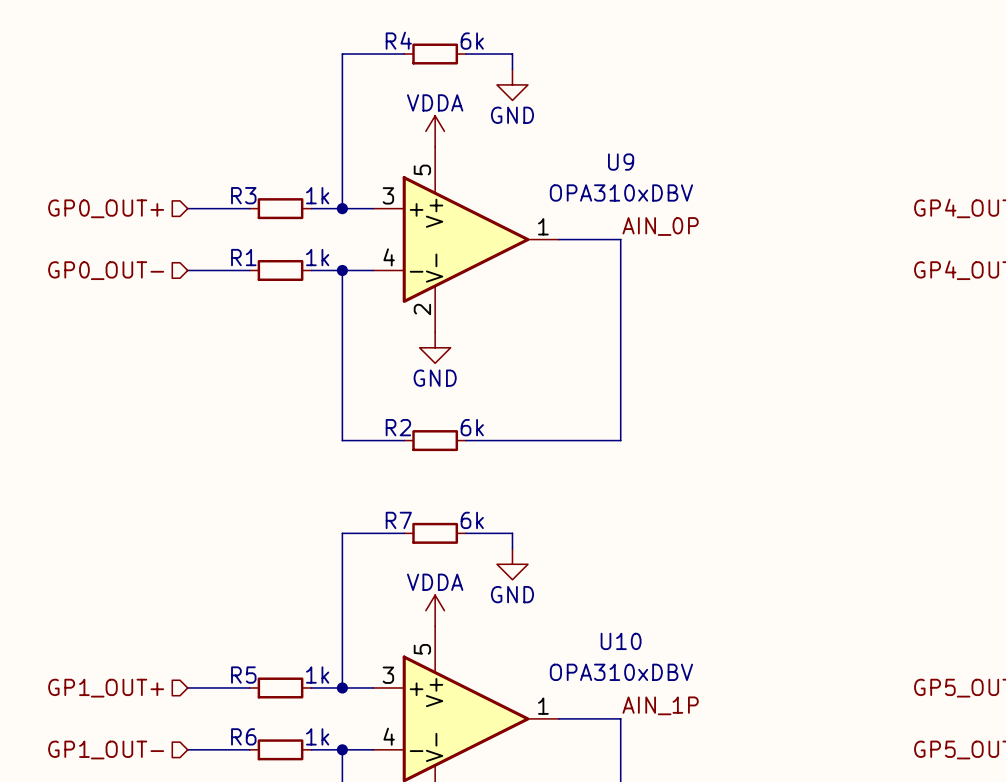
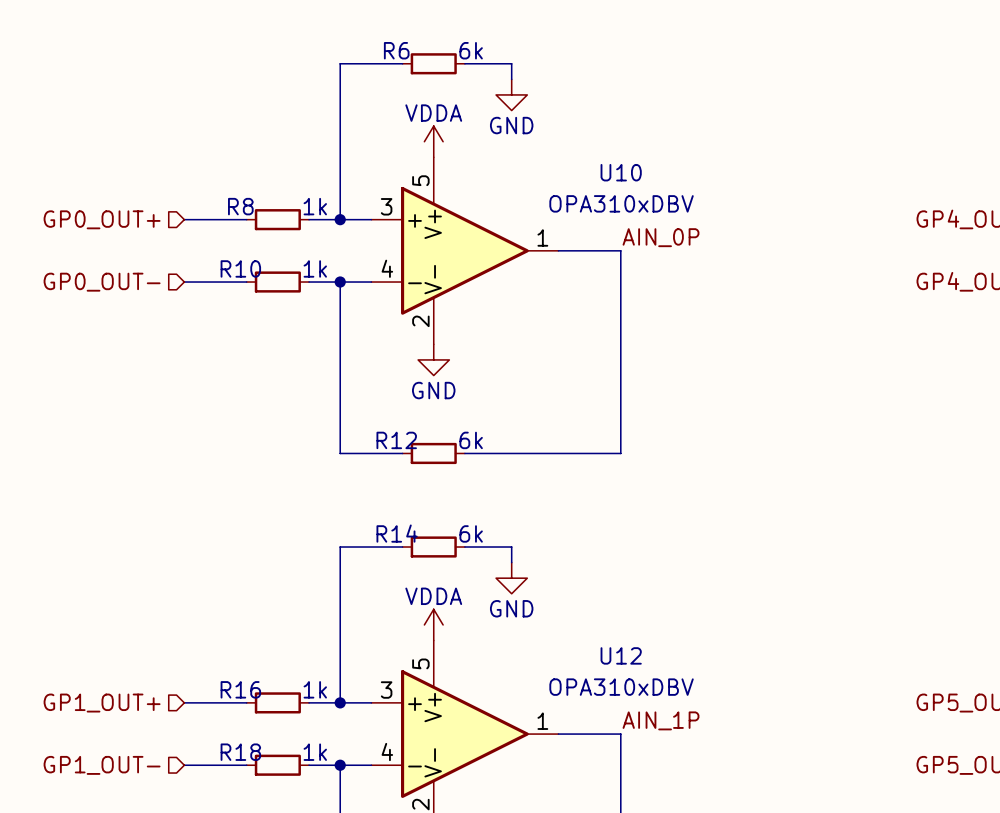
R4 name: R4 (398, 40) -> R6 (396, 50)
U9 name: U9 (621, 162) -> U10 (621, 172)
R3 name: R3 (243, 195) -> R8 (240, 206)
R1 name: R1 (243, 257) -> R10 (240, 268)
R2 name: R2 (398, 427) -> R12 (396, 440)
R7 name: R7 (398, 520) -> R14 (397, 533)
U10 name: U10 (621, 641) -> U12 (621, 655)
R5 name: R5 (243, 675) -> R16 (240, 689)
R6 name: R6 (243, 736) -> R18 (240, 752)

